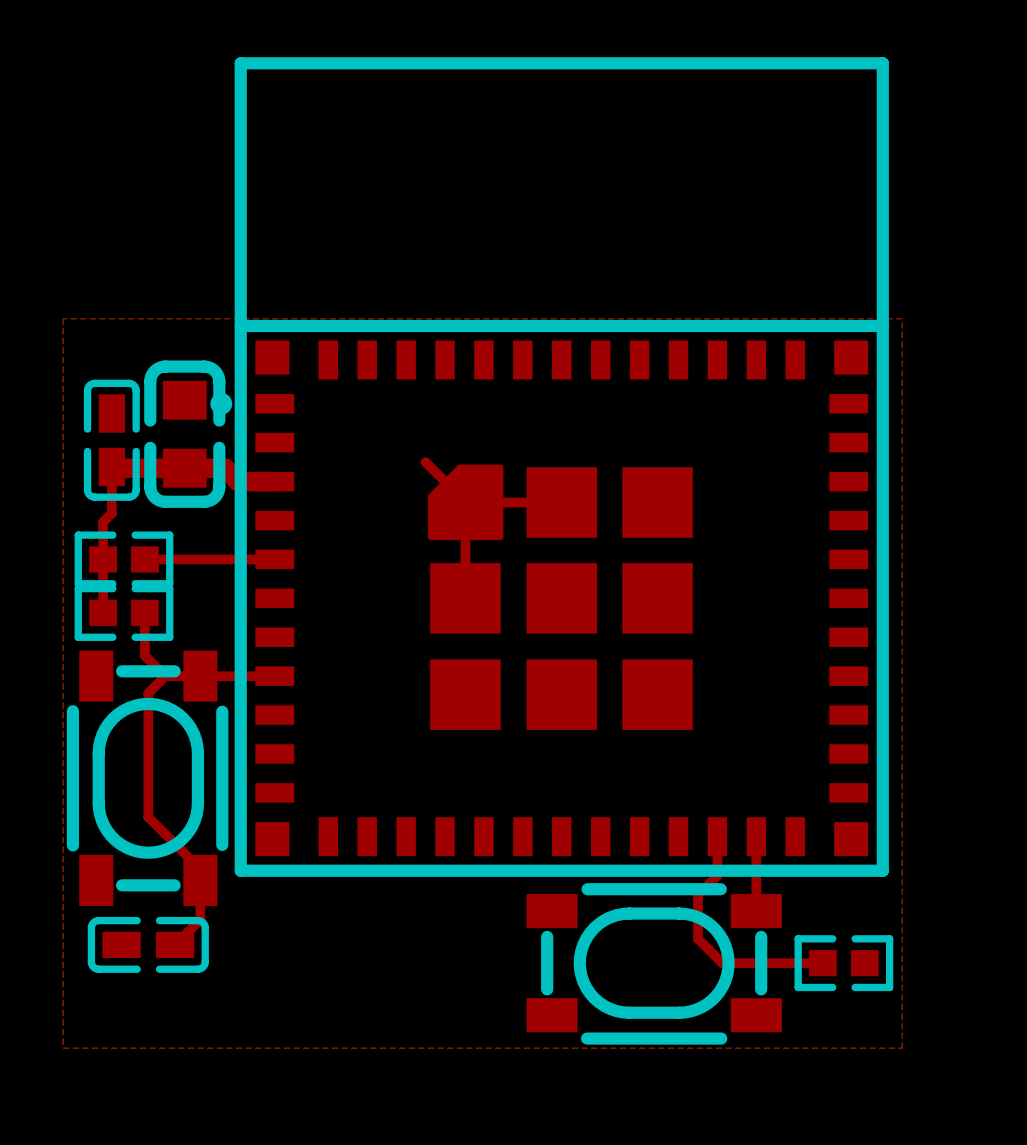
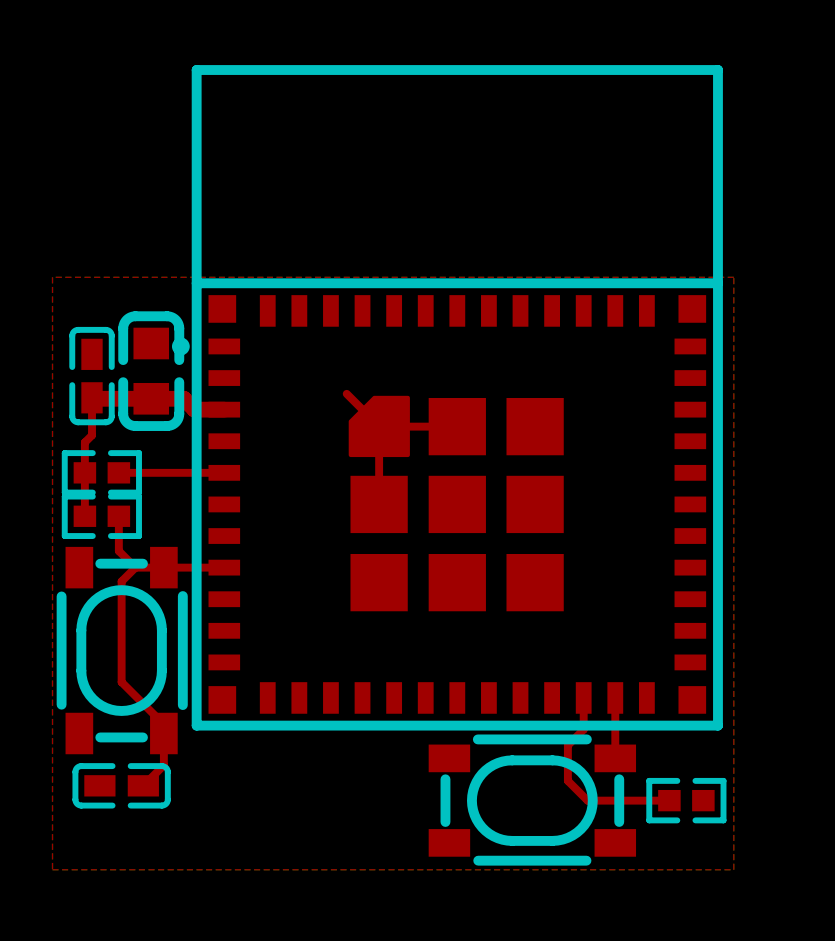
part rotation: 0° (147, 778) -> 180° (122, 650)
part rotation: 0° (654, 963) -> 180° (532, 800)

